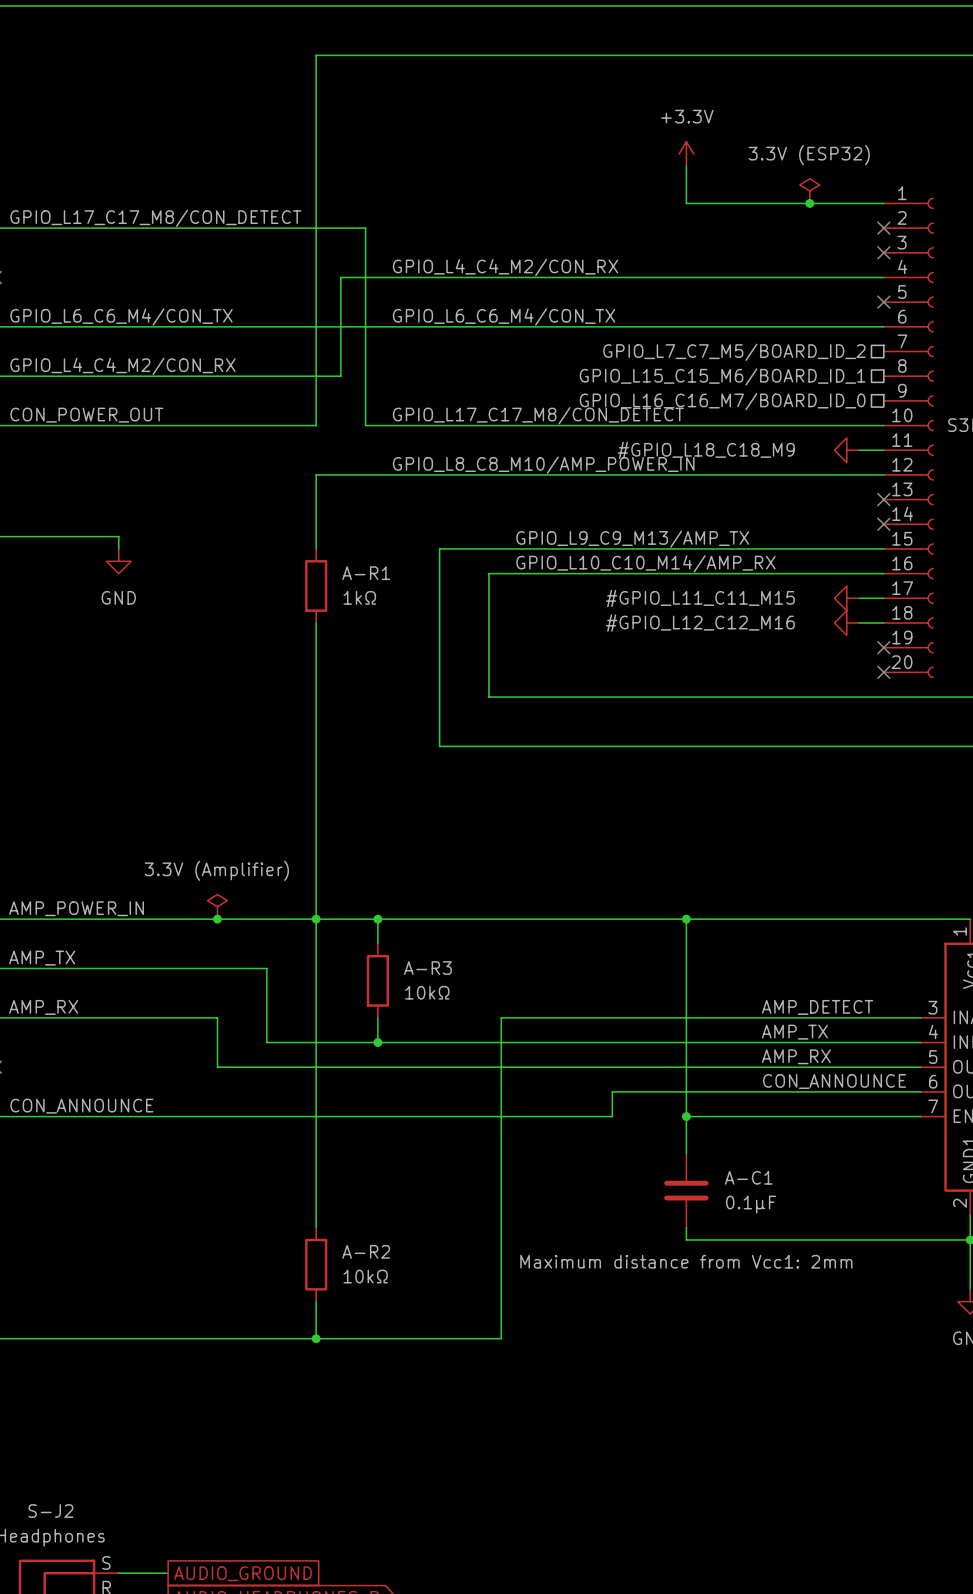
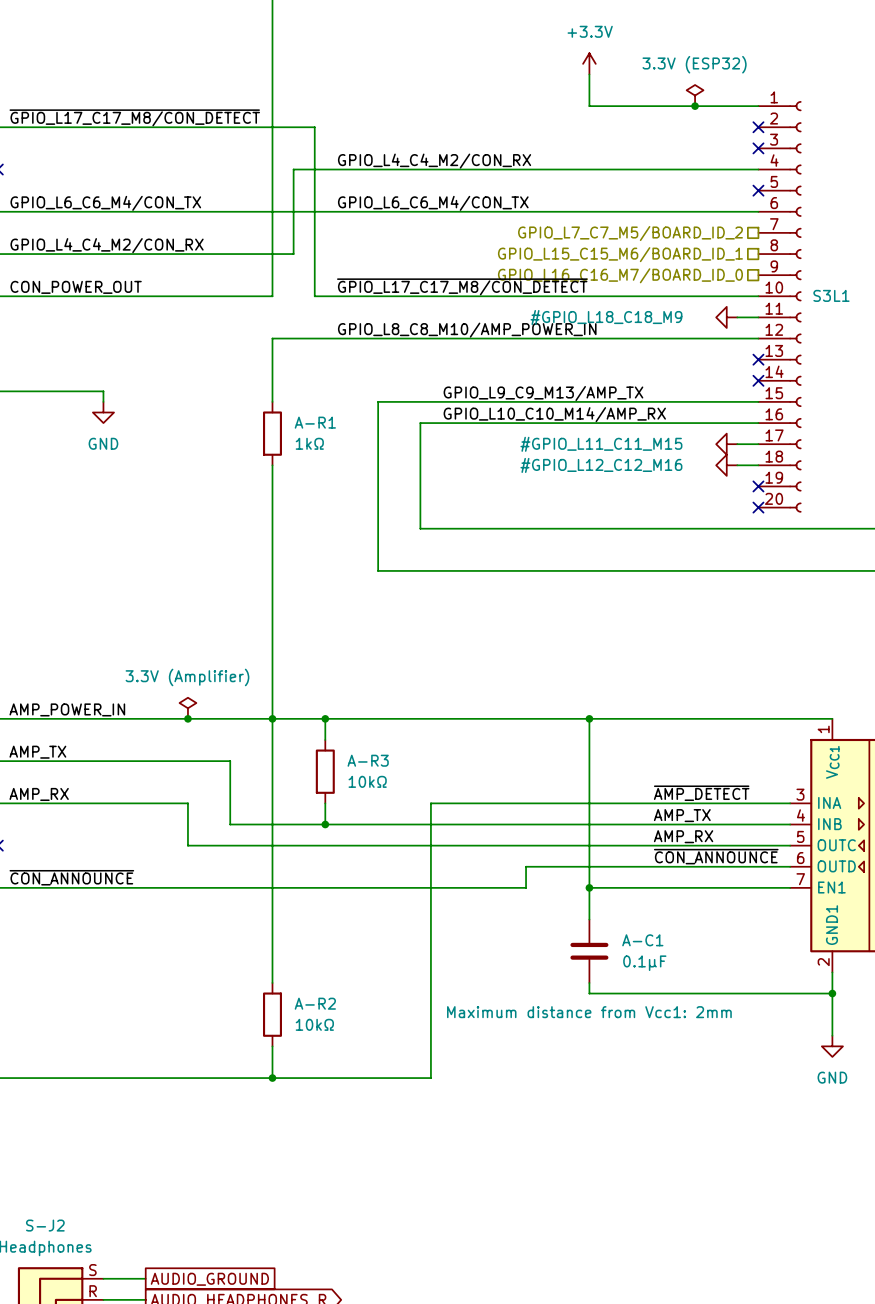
label: GPIO_L17_C17_M8/CON_DETECT (155, 218) -> ~{GPIO_L17_C17_M8/CON_DETECT} (134, 117)
label: GPIO_L17_C17_M8/CON_DETECT (538, 415) -> ~{GPIO_L17_C17_M8/CON_DETECT} (462, 286)
label: AMP_DETECT (817, 1007) -> ~{AMP_DETECT} (701, 793)
label: CON_ANNOUNCE (834, 1081) -> ~{CON_ANNOUNCE} (716, 856)
label: CON_ANNOUNCE (81, 1106) -> ~{CON_ANNOUNCE} (71, 877)

